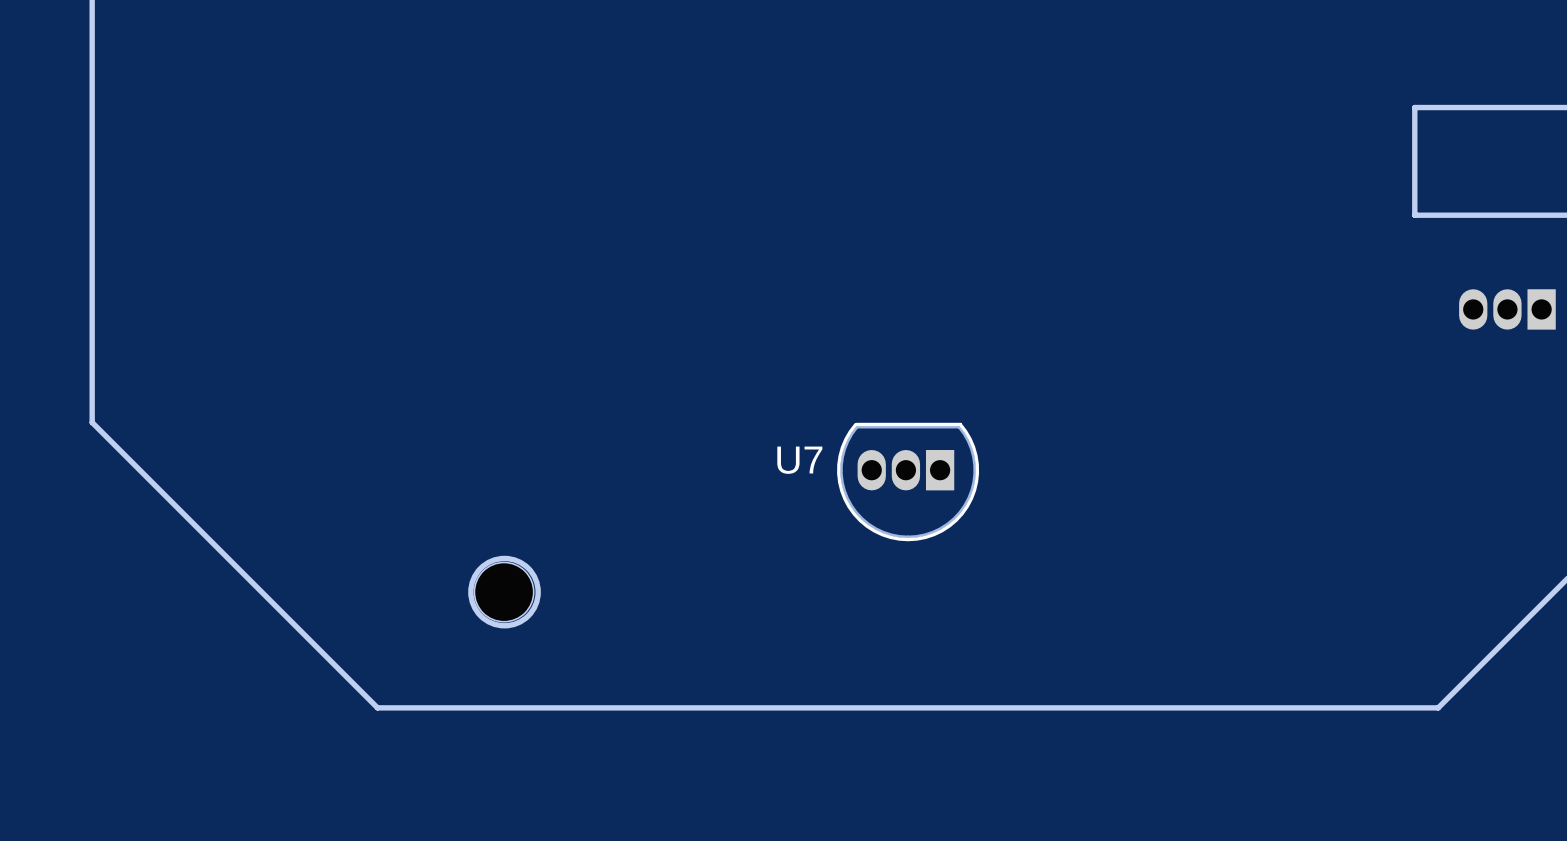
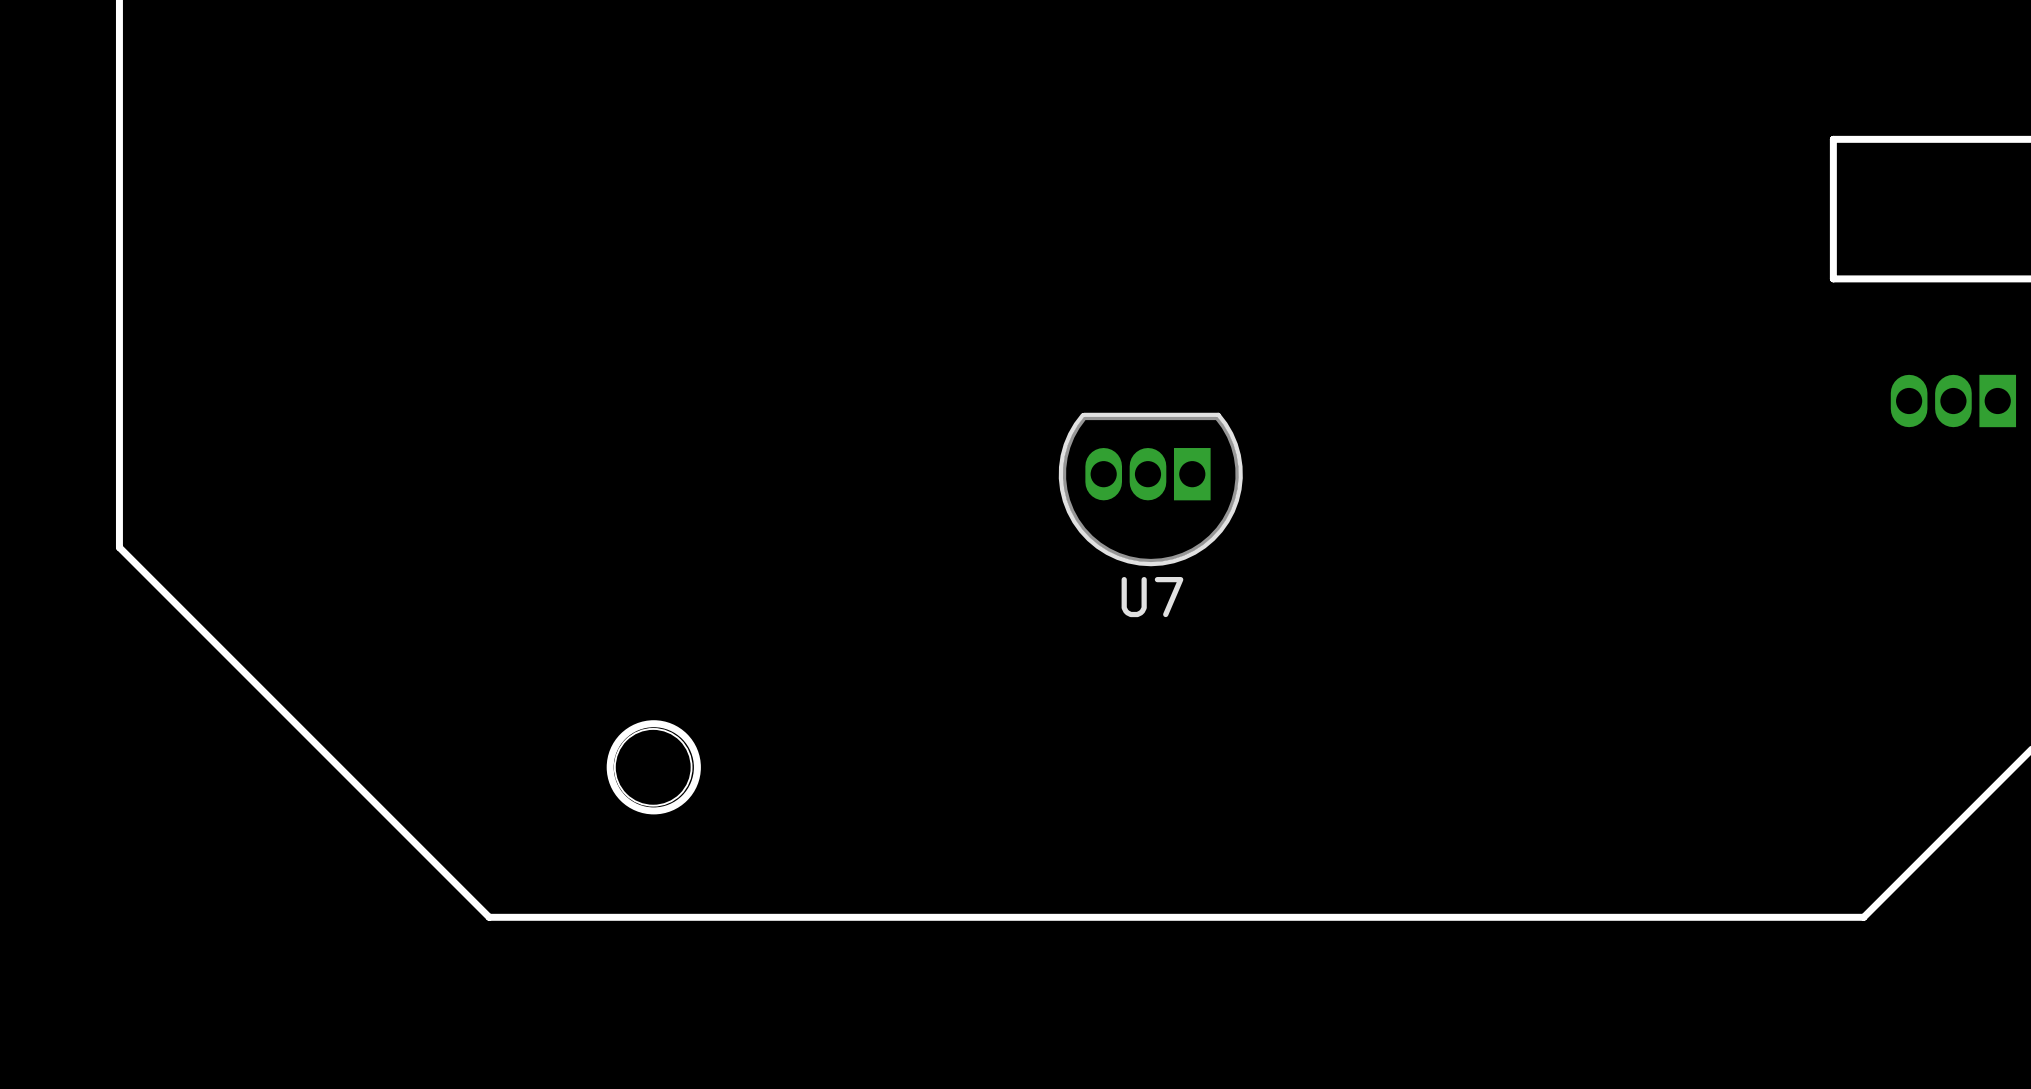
U7 name position: U7 (799, 460) -> U7 (1152, 597)
U7 position: (908, 482) -> (1150, 489)

